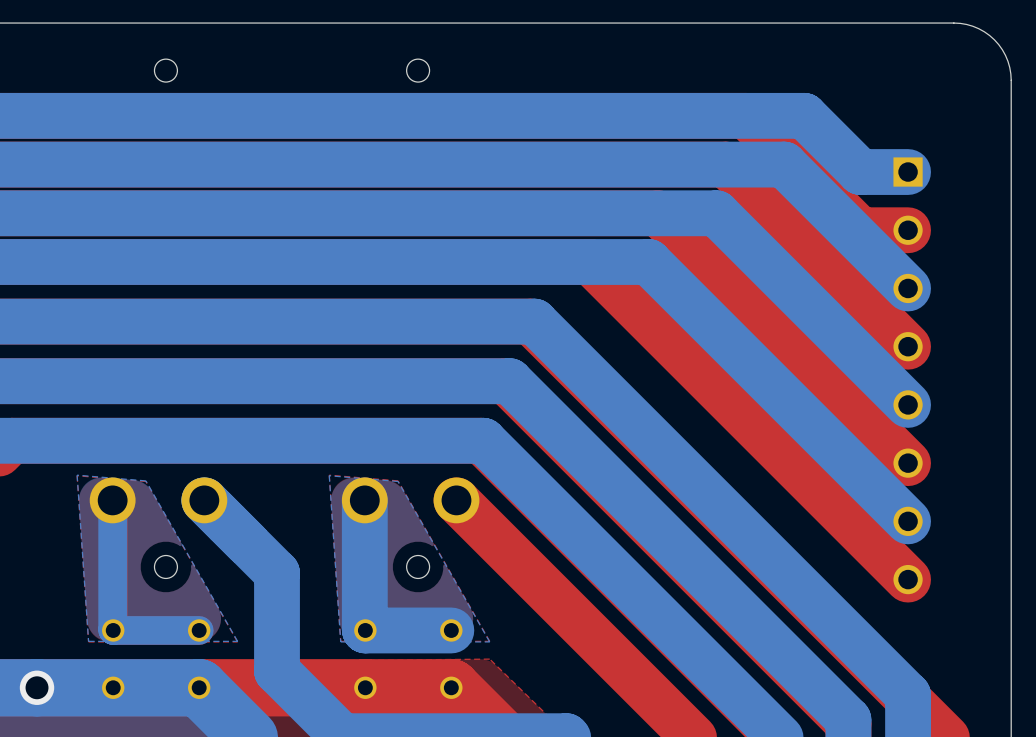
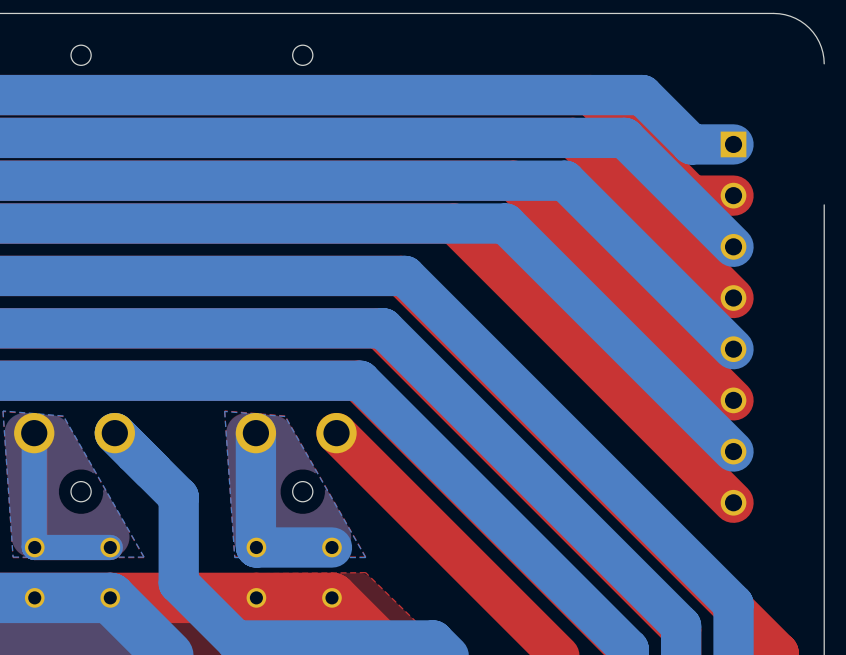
board edge: (1011, 80) (1011, 240) -> none

